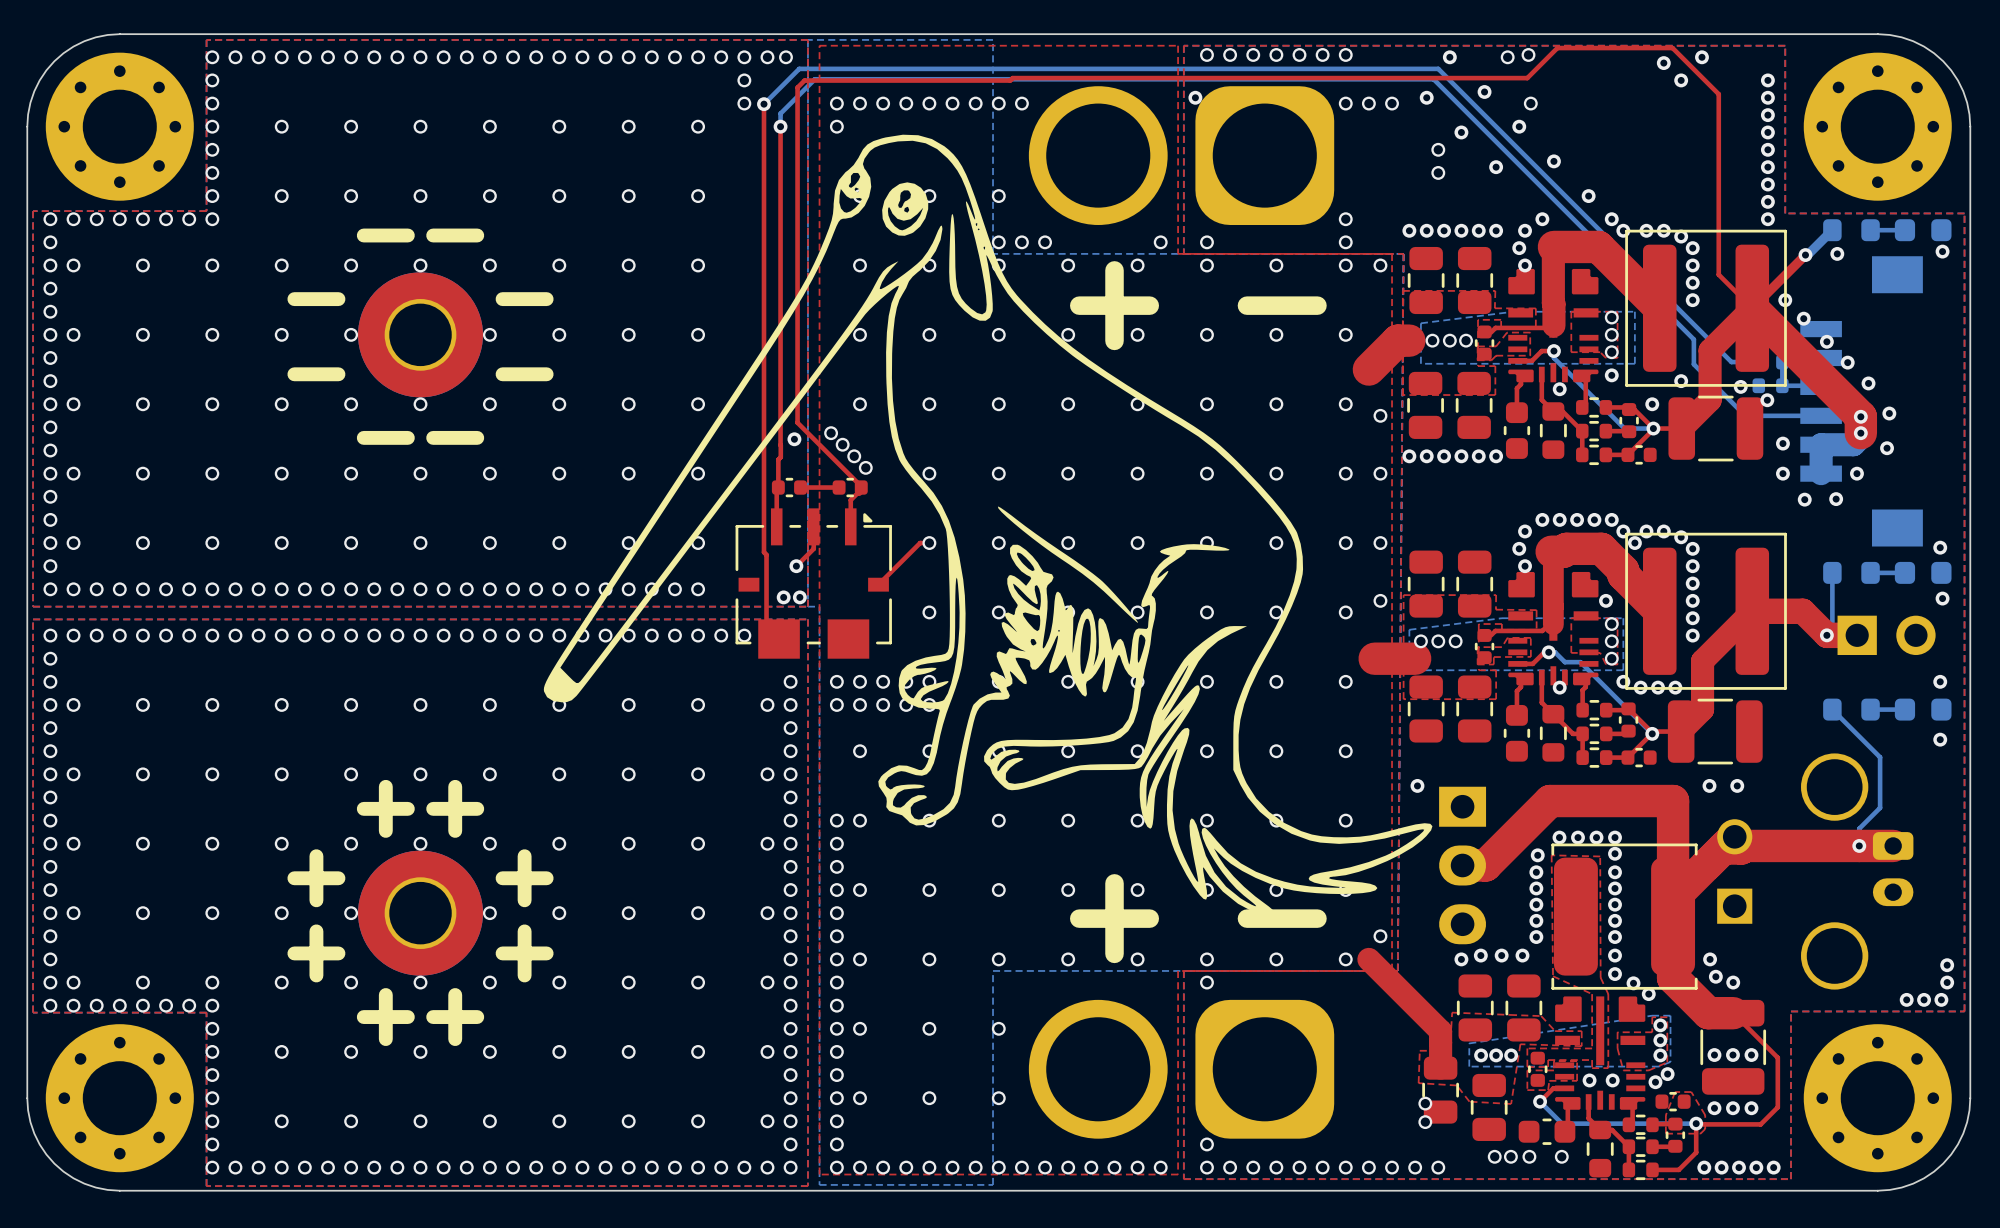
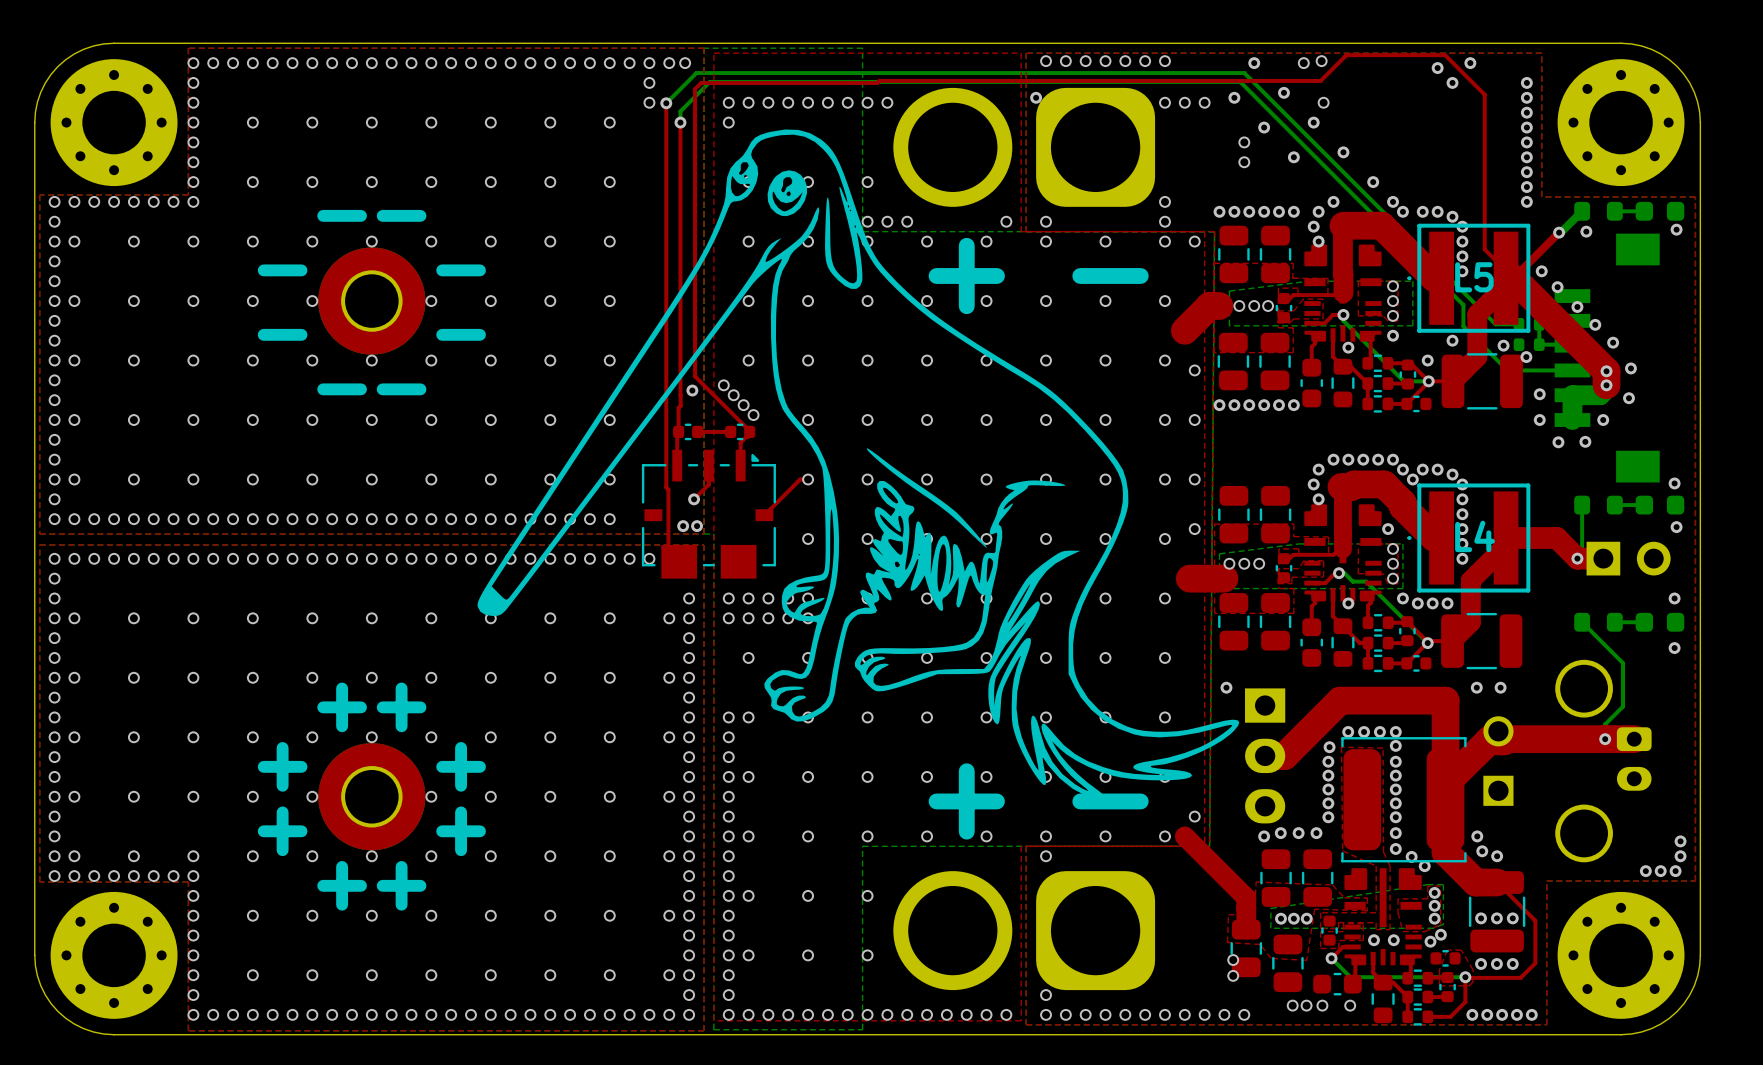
L5: none -> (1468, 278)
part: (1706, 308) -> none
L4: none -> (1468, 537)
part: (1706, 611) -> none

